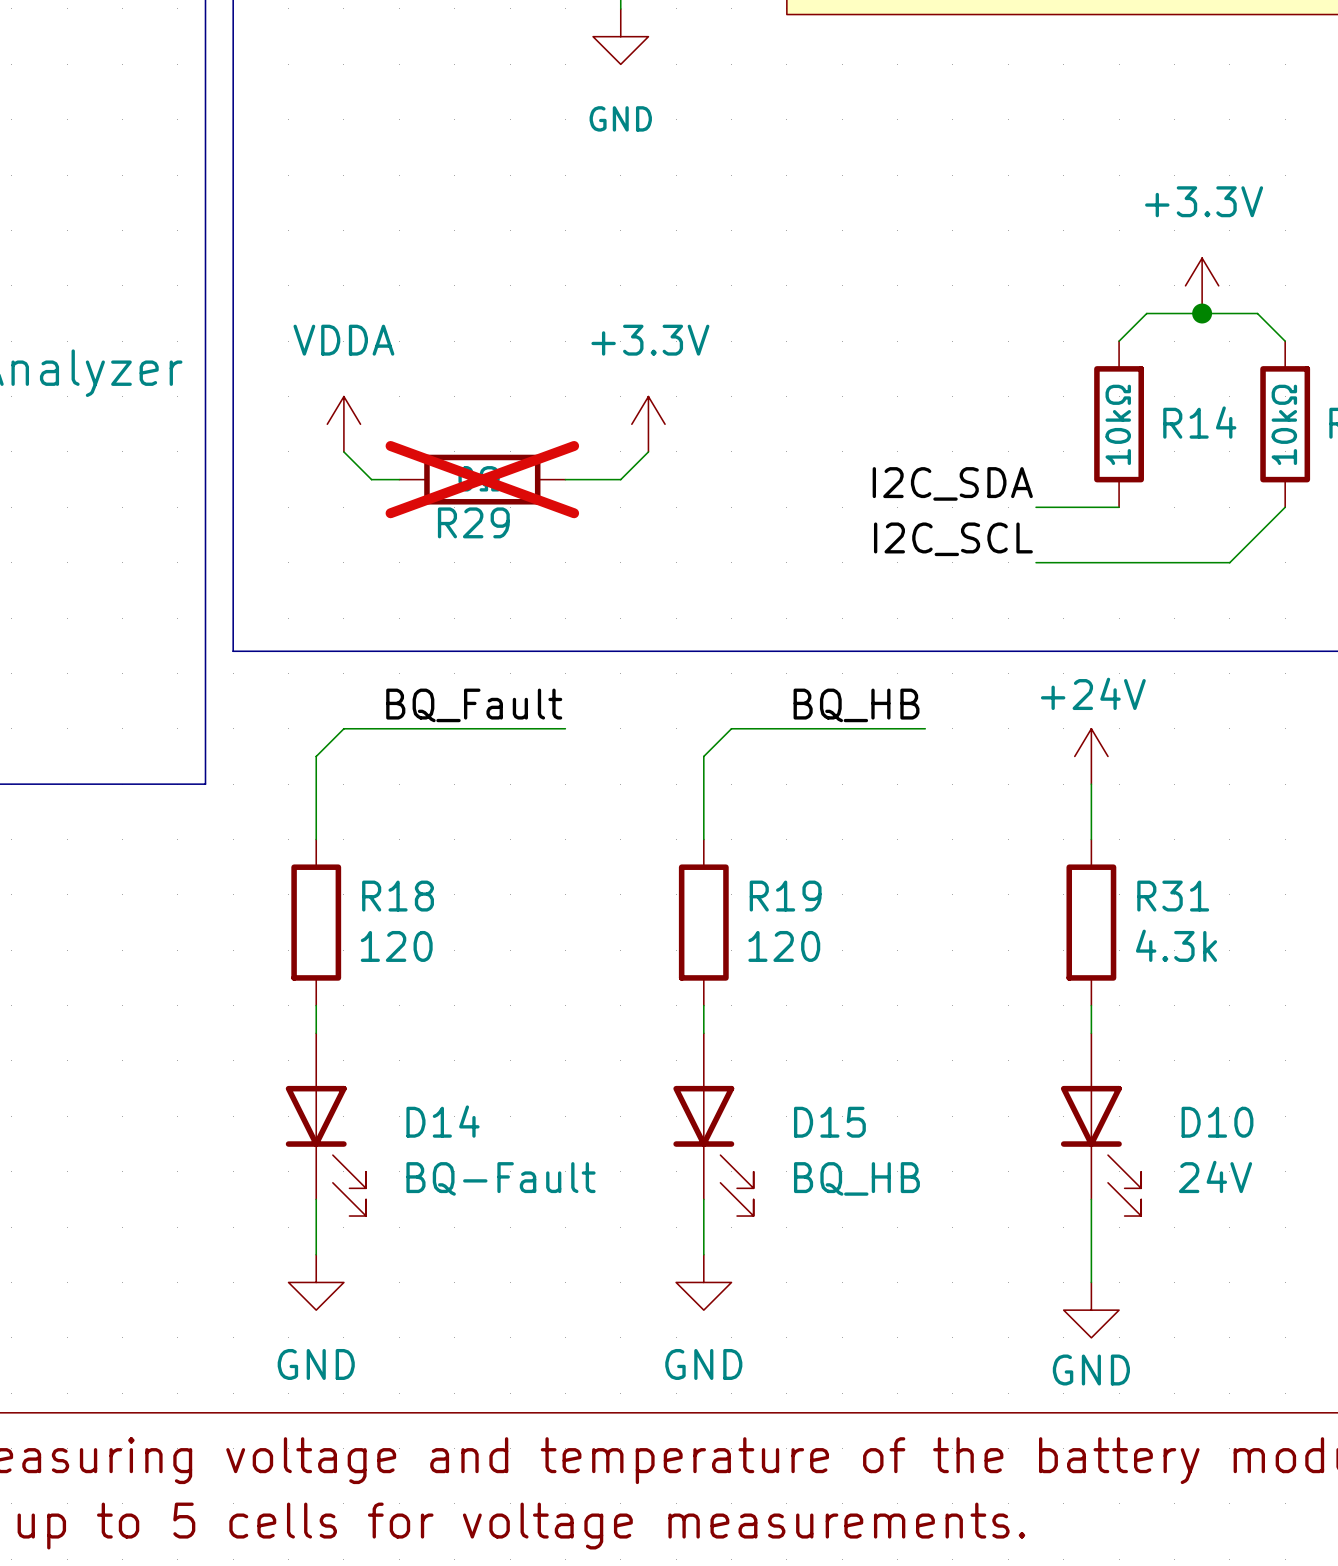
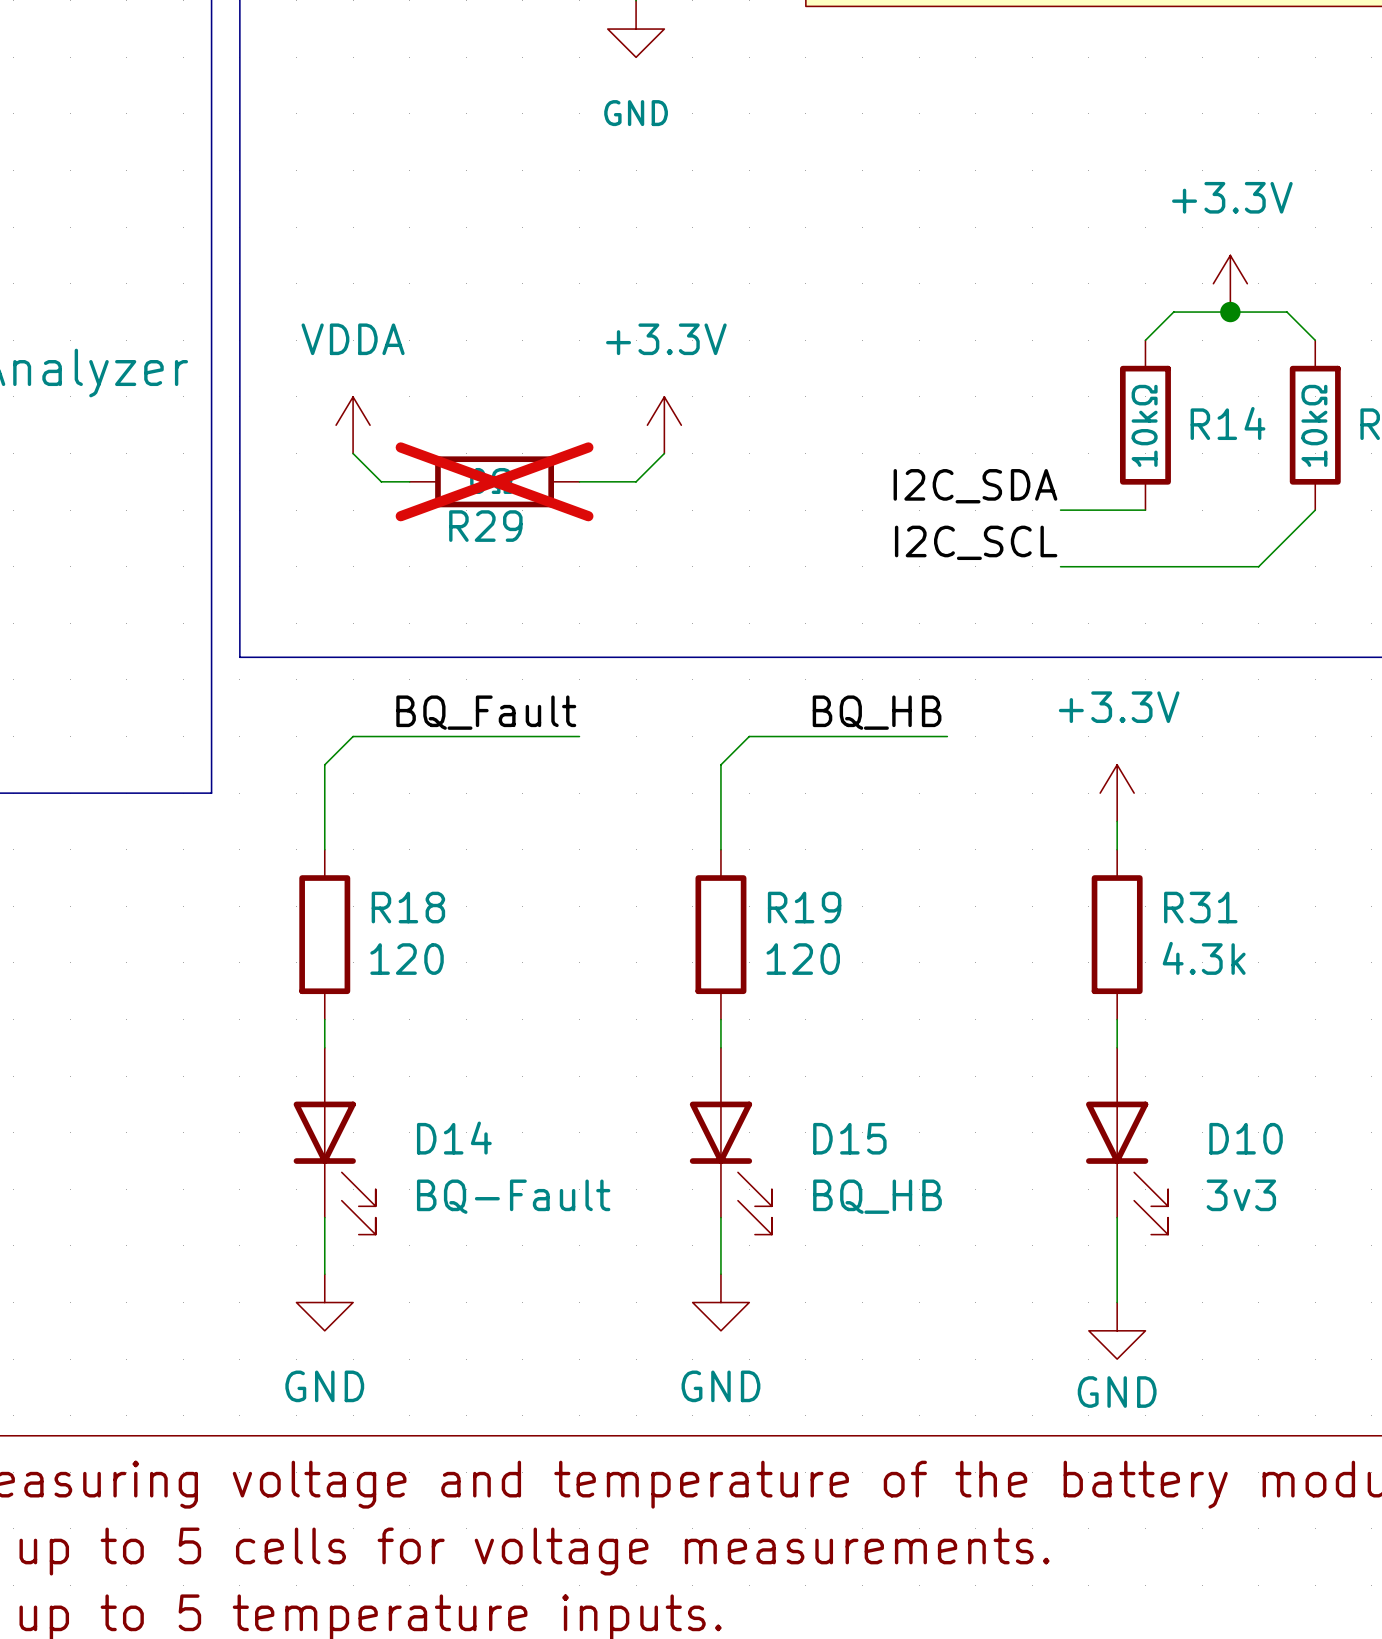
power symbol: +24V (1091, 756) -> none
power symbol: none -> +3.3V (1117, 793)
D10 value: 24V (1215, 1176) -> 3v3 (1241, 1195)

